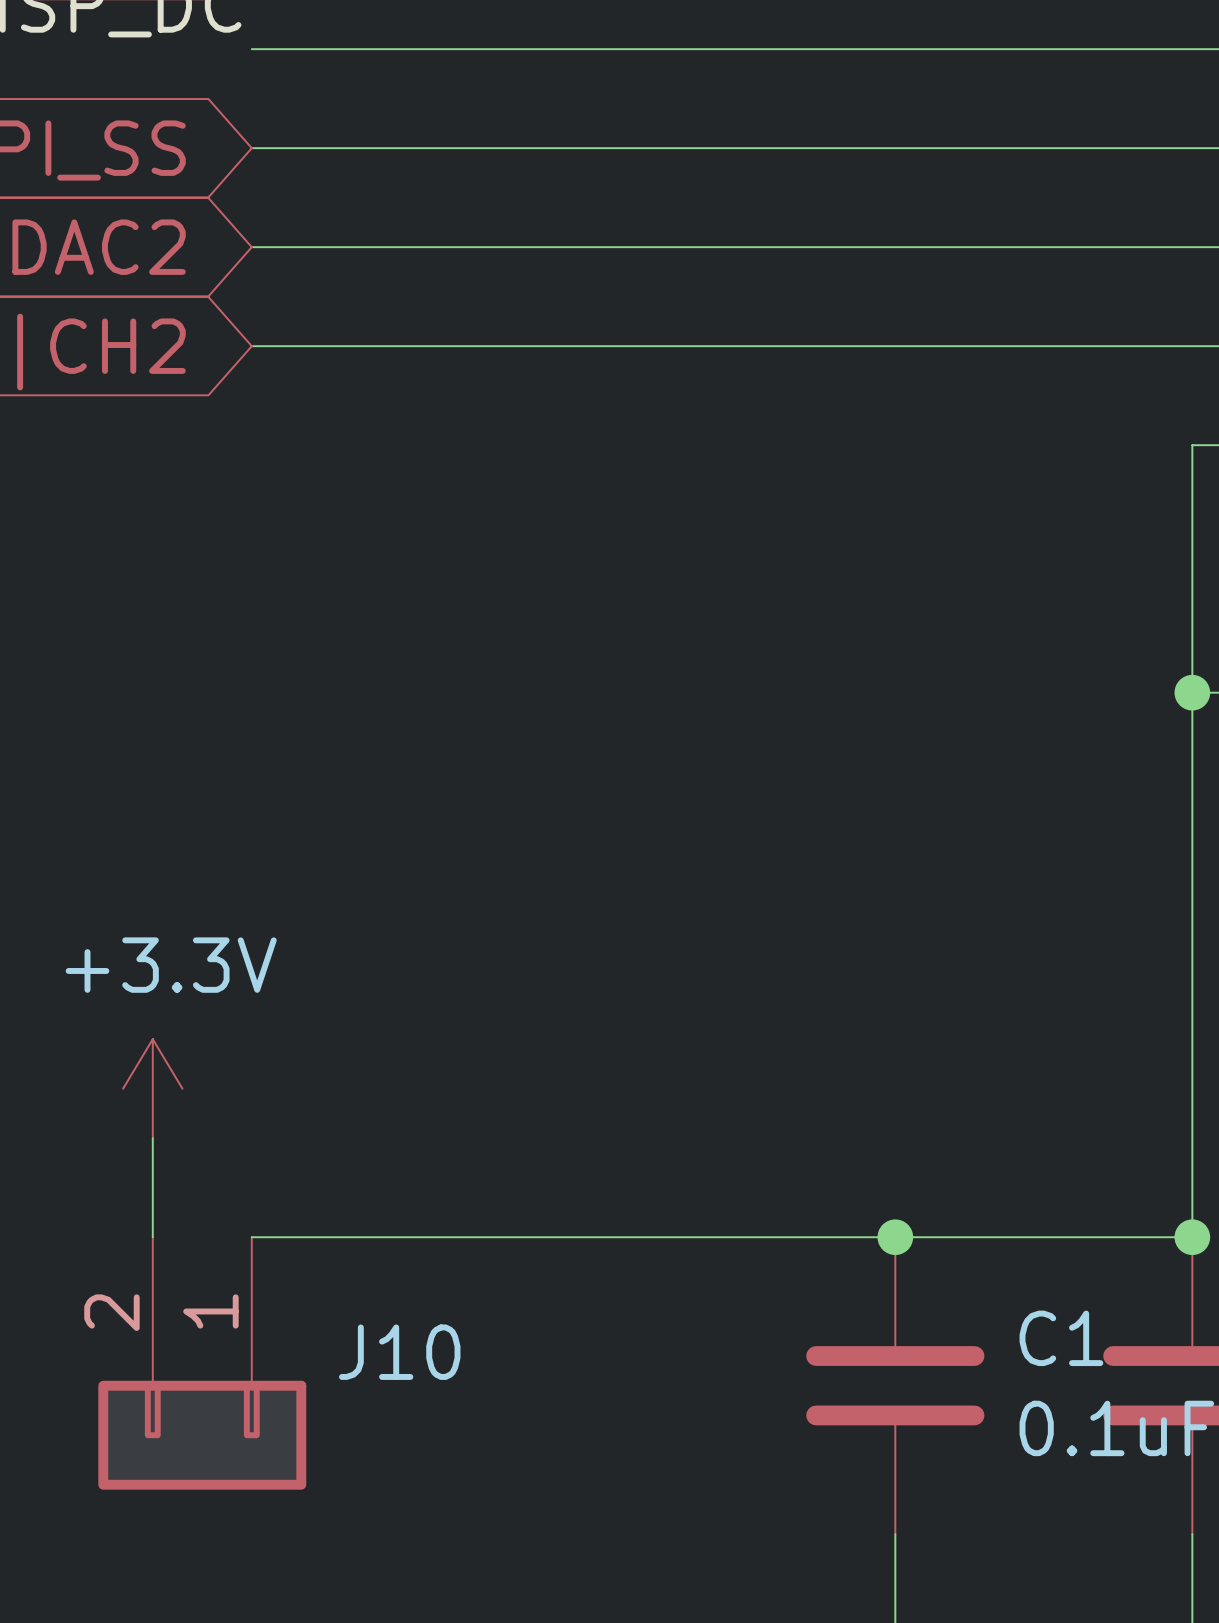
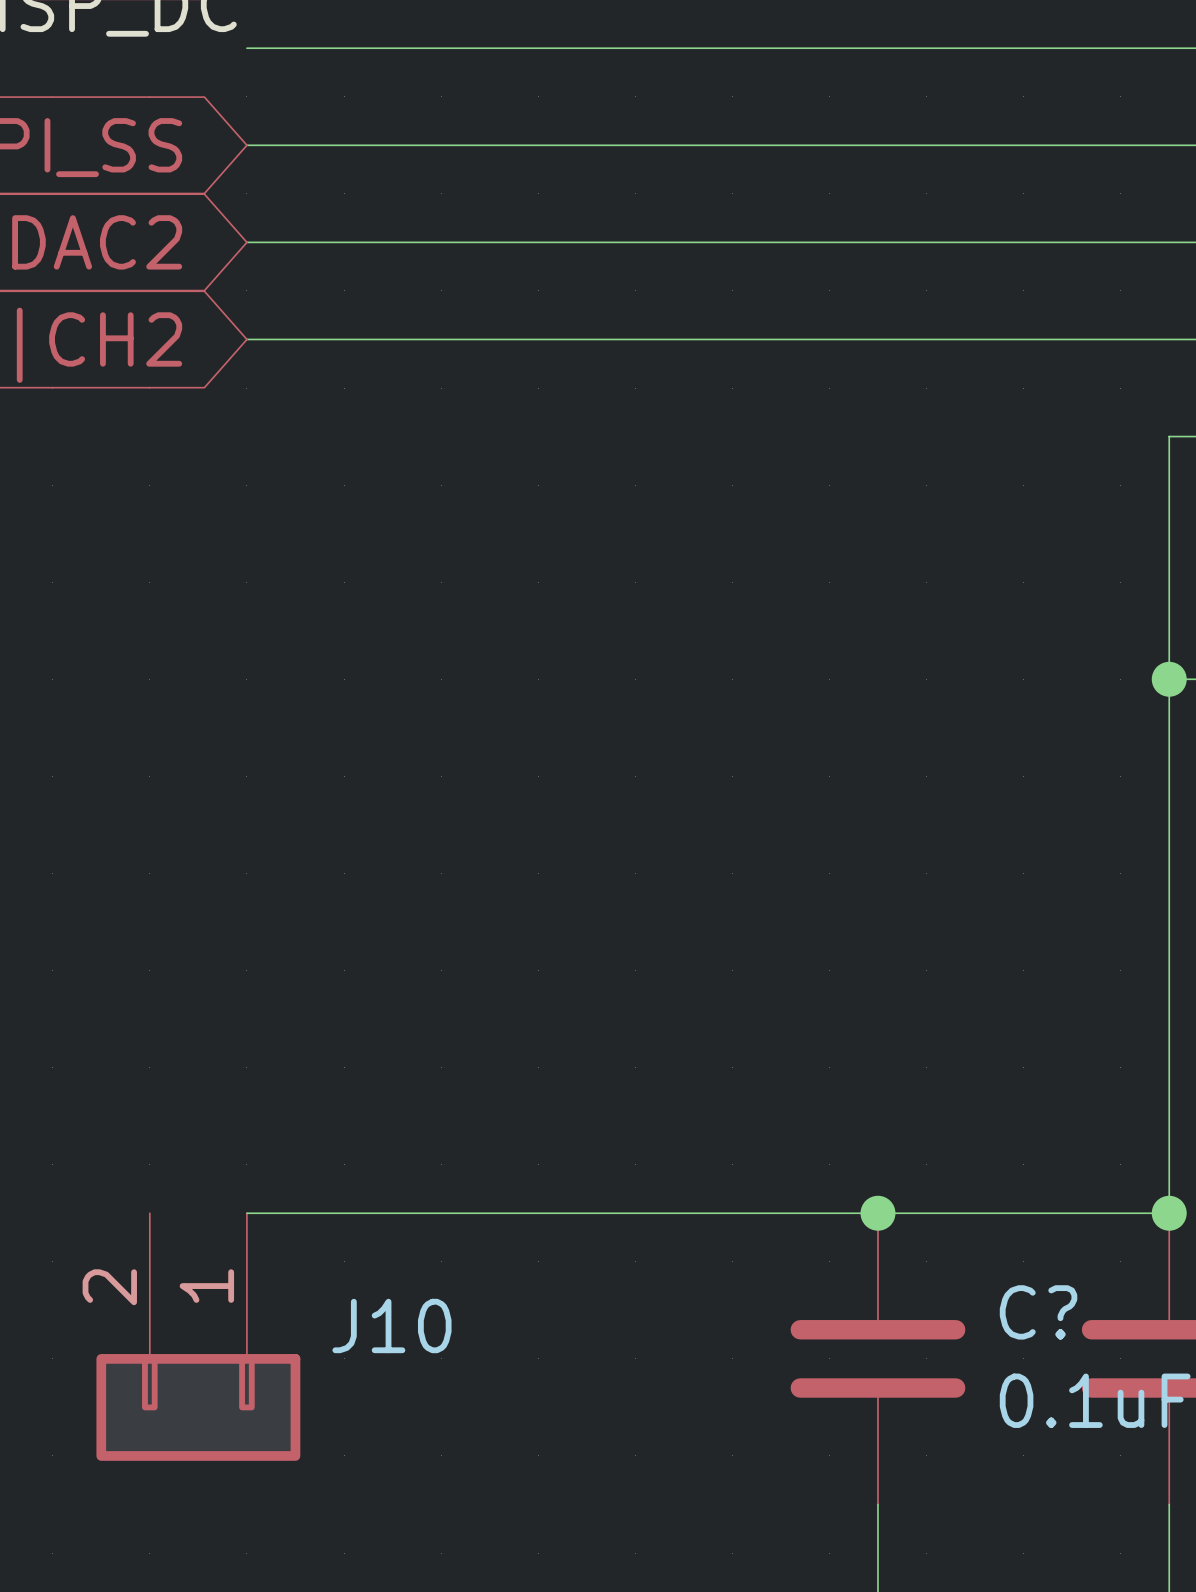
power symbol: +3.3V (152, 1088) -> none
wire: (152, 1138) (152, 1237) -> none
C1 name: C1 (1061, 1338) -> C? (1038, 1312)

